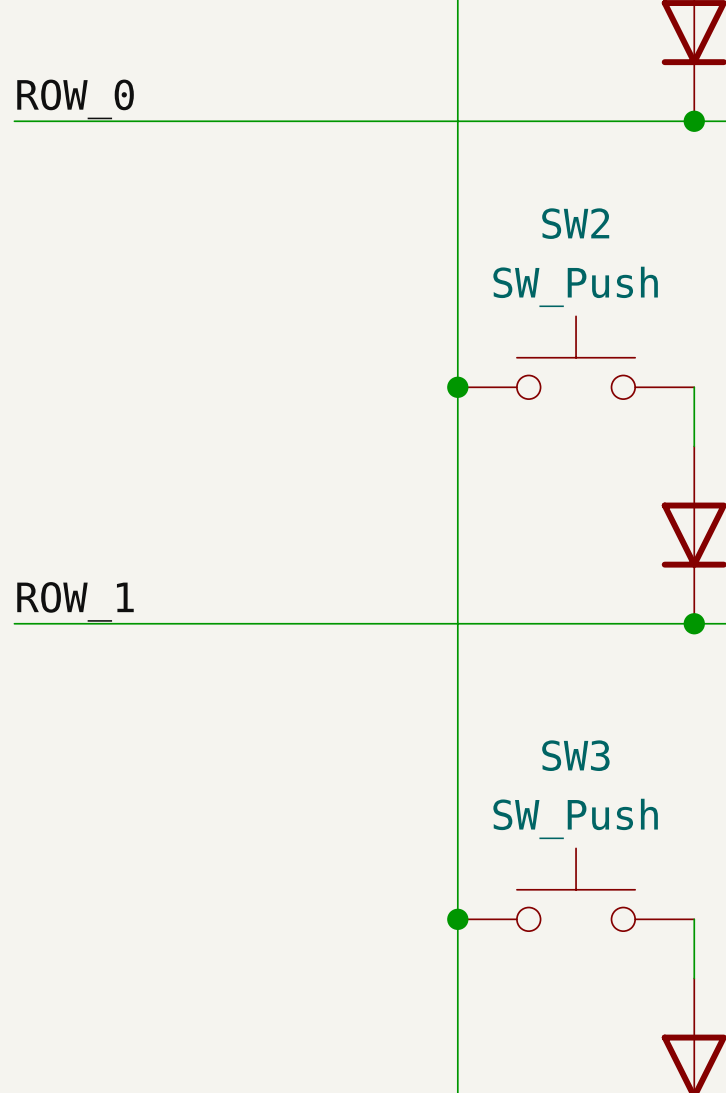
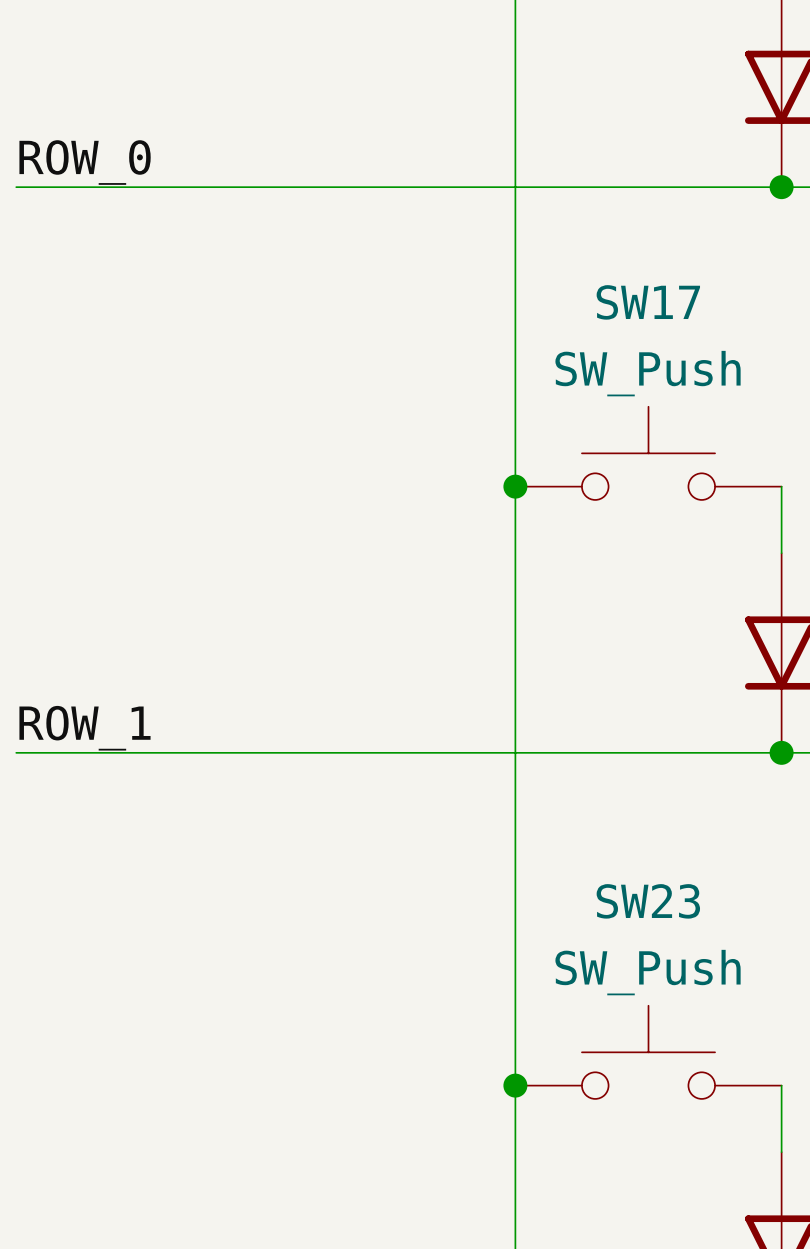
SW2 name: SW2 (575, 223) -> SW17 (648, 302)
SW3 name: SW3 (575, 755) -> SW23 (648, 901)

